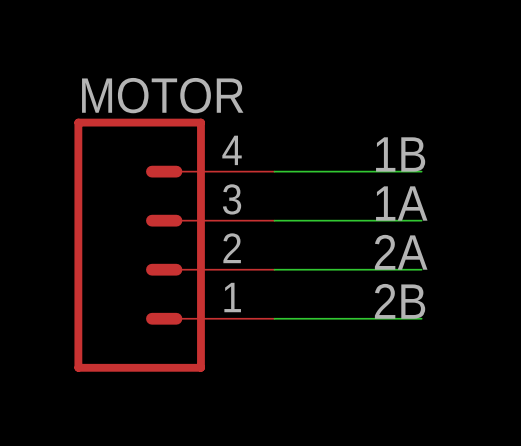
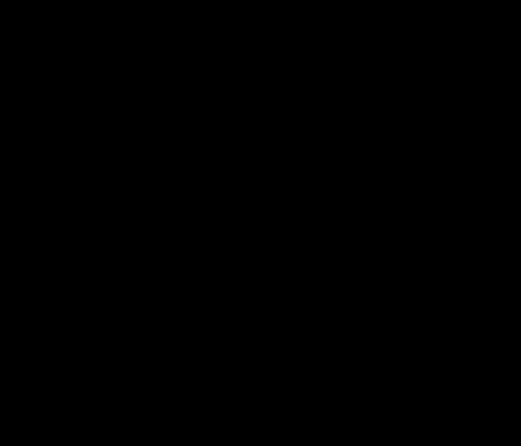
label: 1B (400, 154) -> none
wire: (274, 171) (421, 171) -> none
label: 1A (401, 203) -> none
wire: (274, 220) (421, 220) -> none
MOTOR: (174, 245) -> none
label: 2A (401, 252) -> none
wire: (274, 269) (421, 269) -> none
label: 2B (400, 301) -> none
wire: (274, 318) (421, 318) -> none

